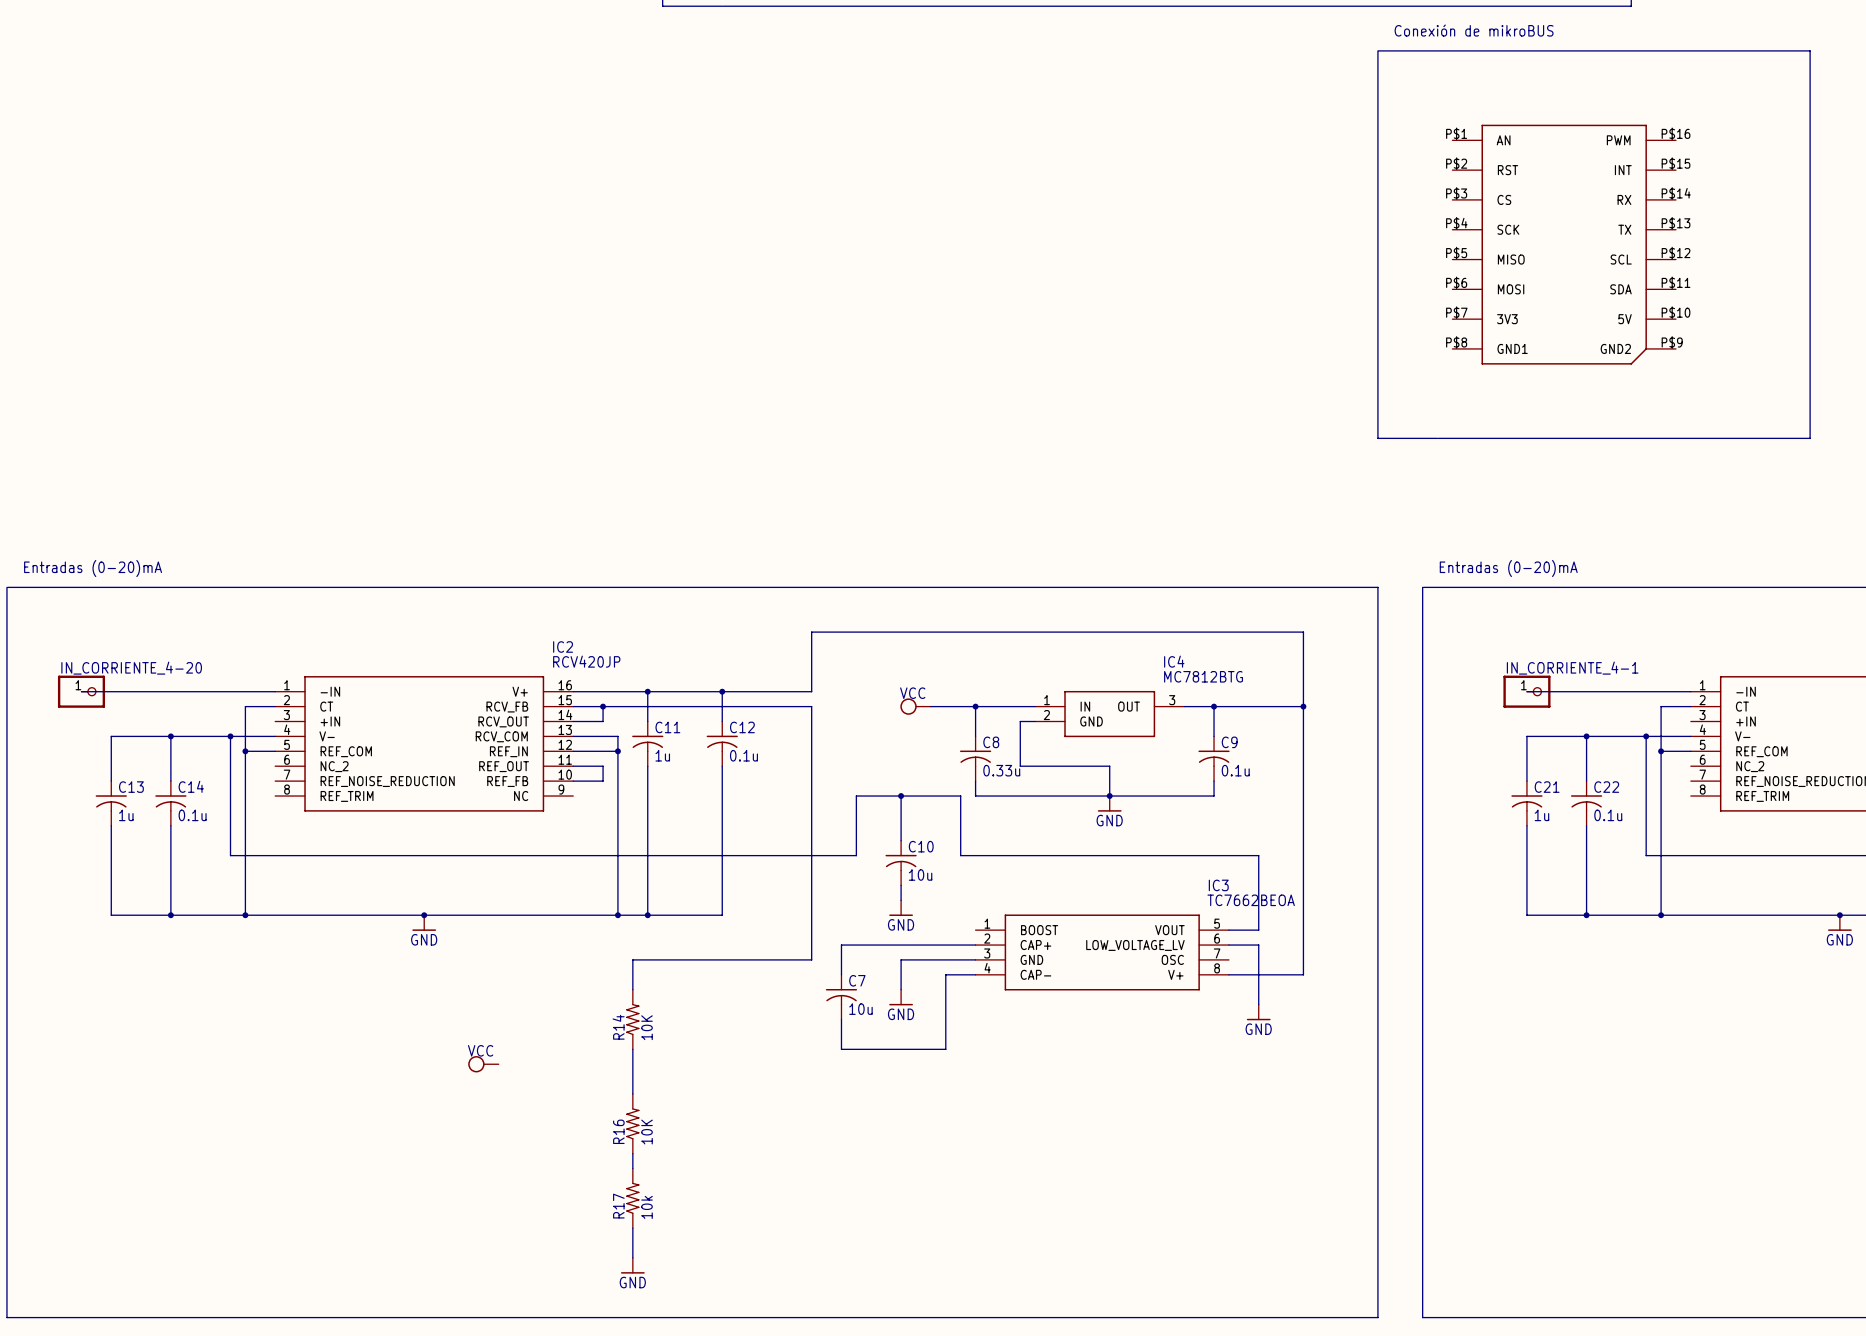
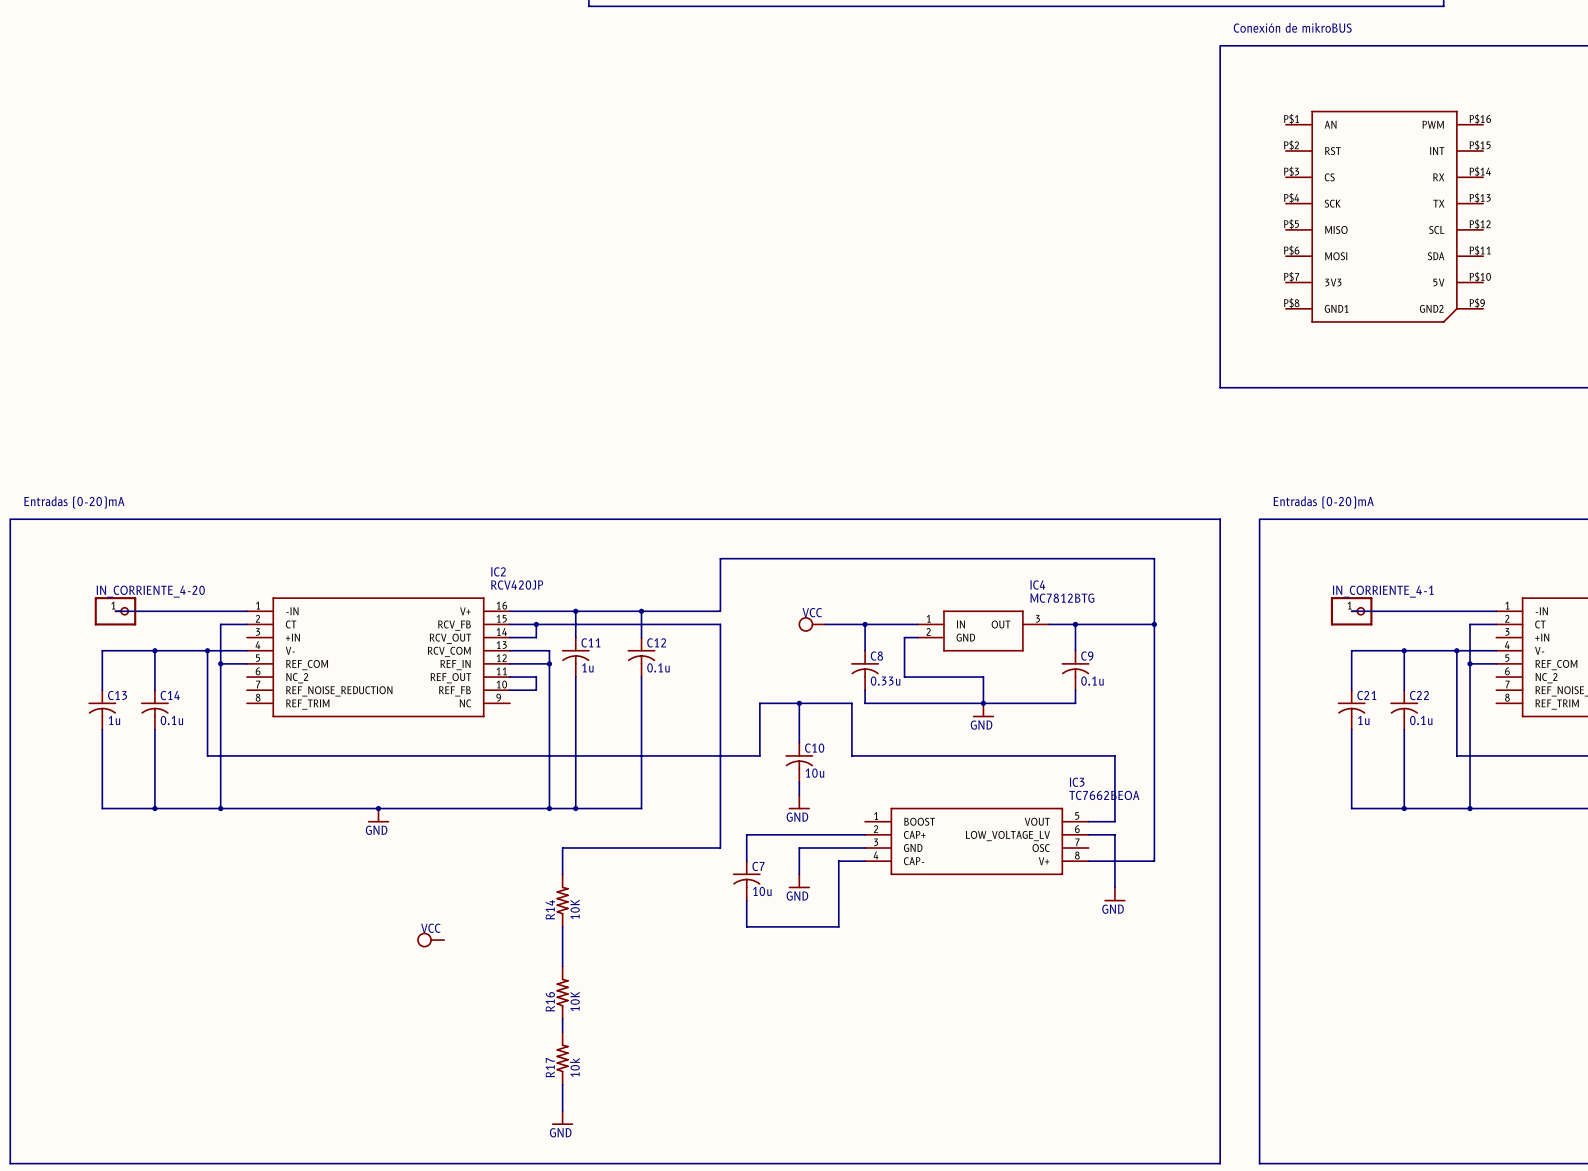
wire: (81, 691) (126, 691) -> none
IN_CORRIENTE_4-20 position: (81, 691) -> (115, 611)

